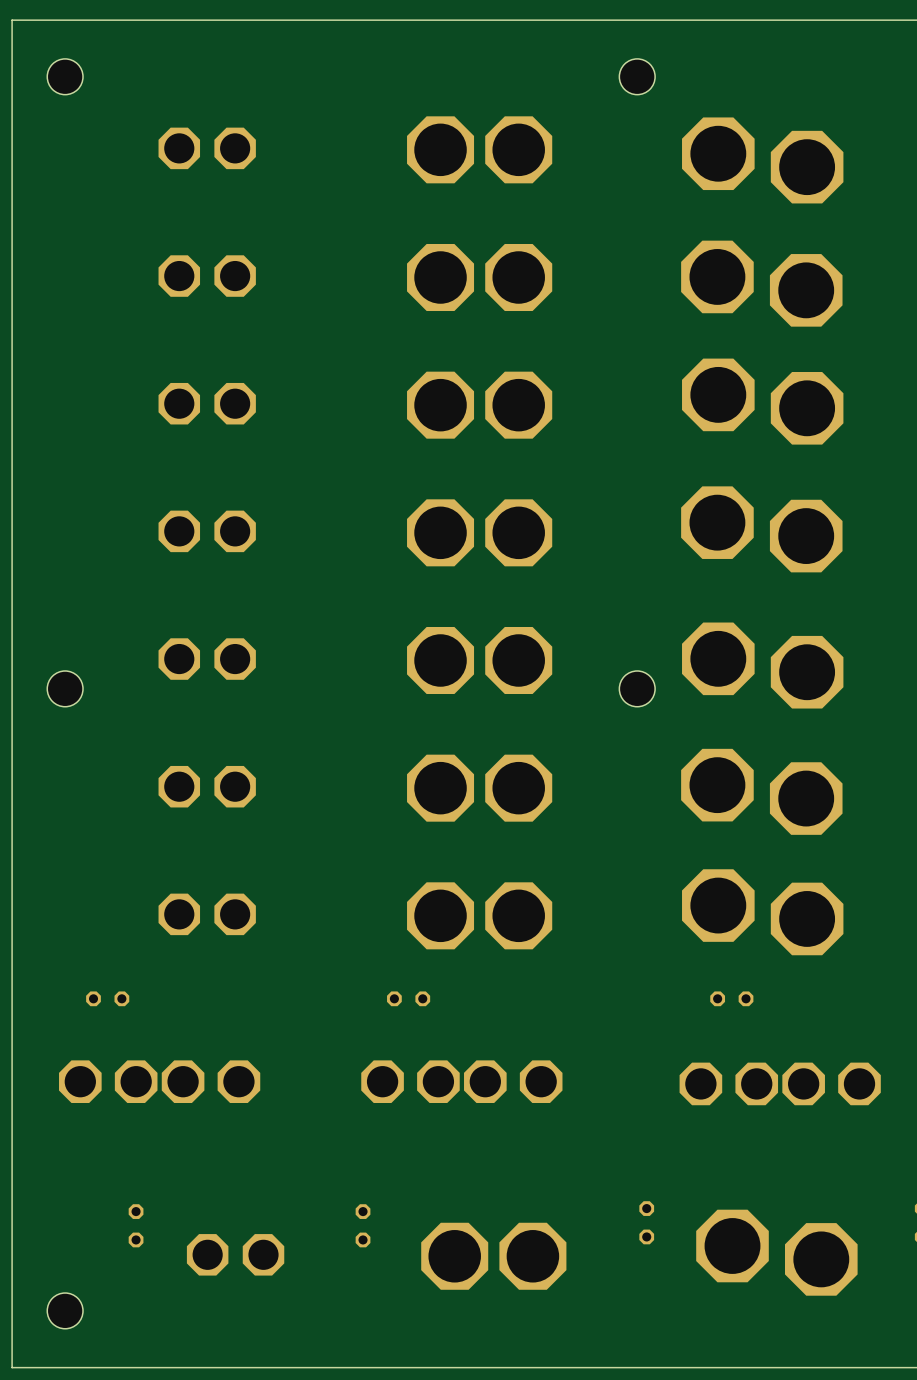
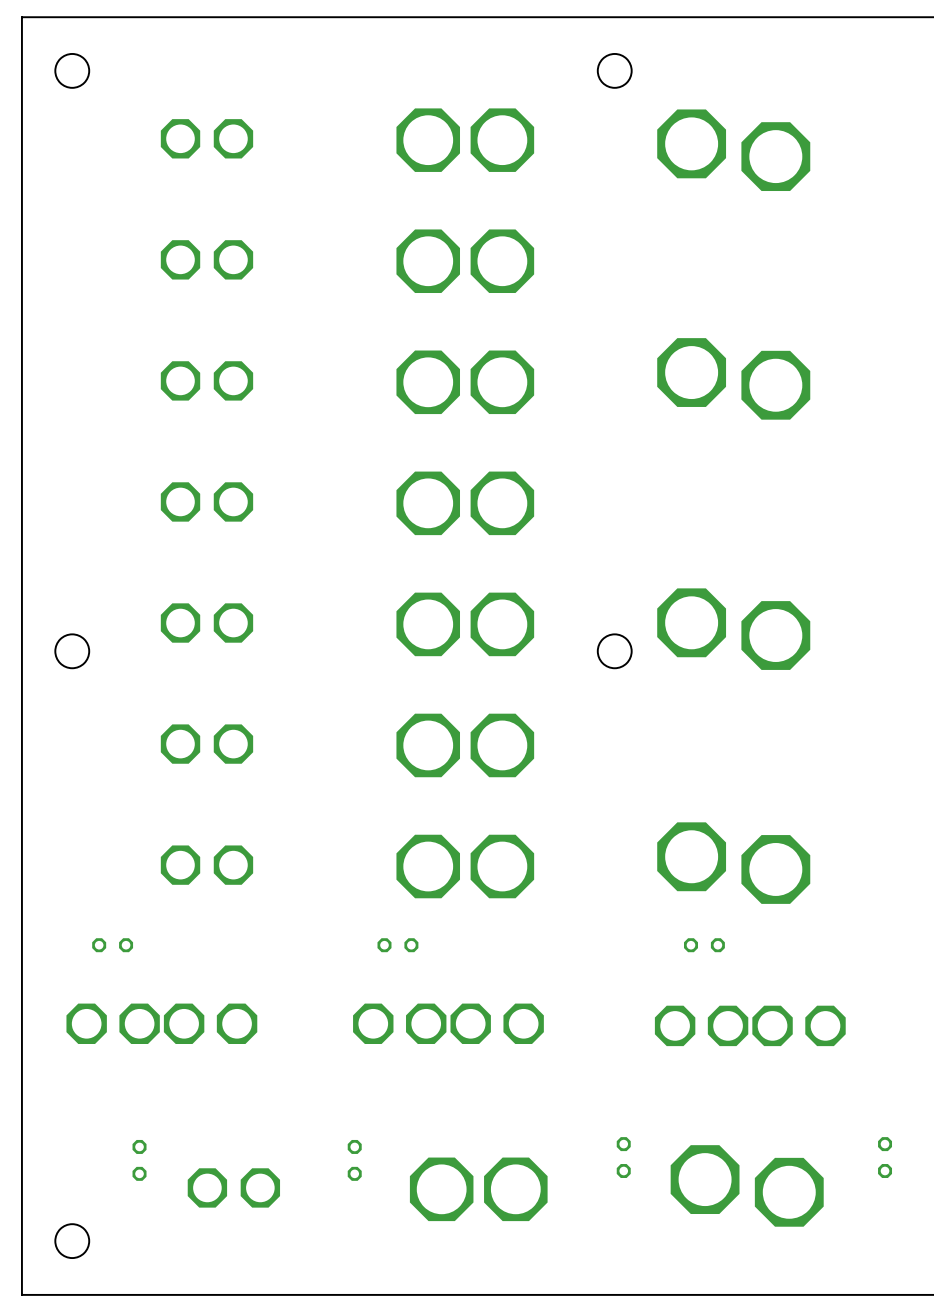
part: (761, 283) -> none
part: (761, 529) -> none
part: (761, 791) -> none

